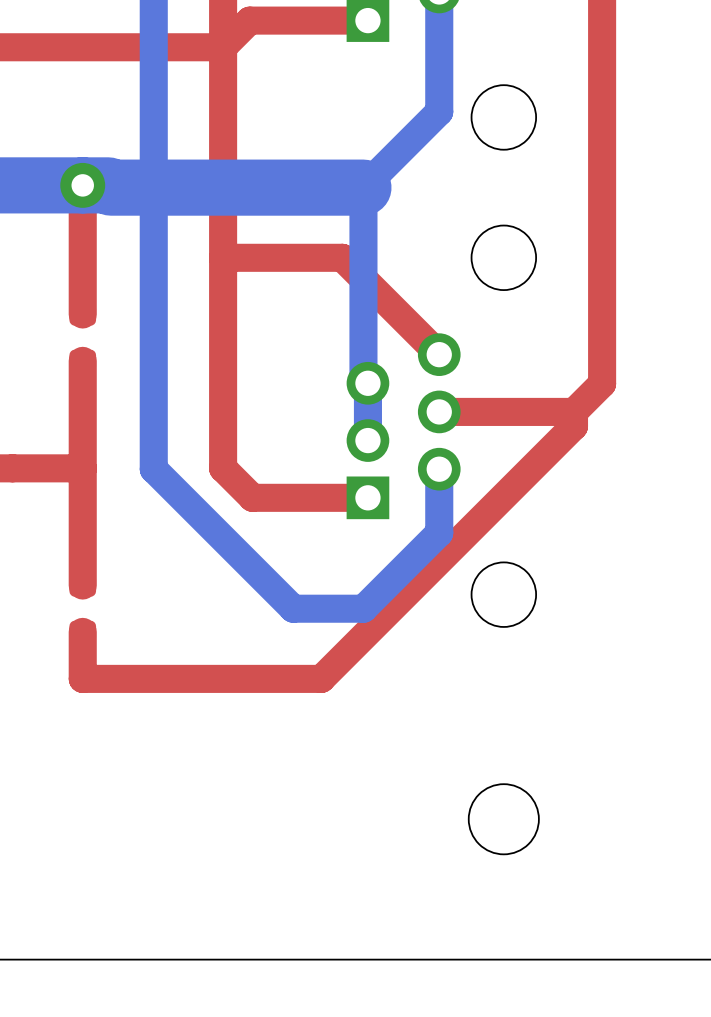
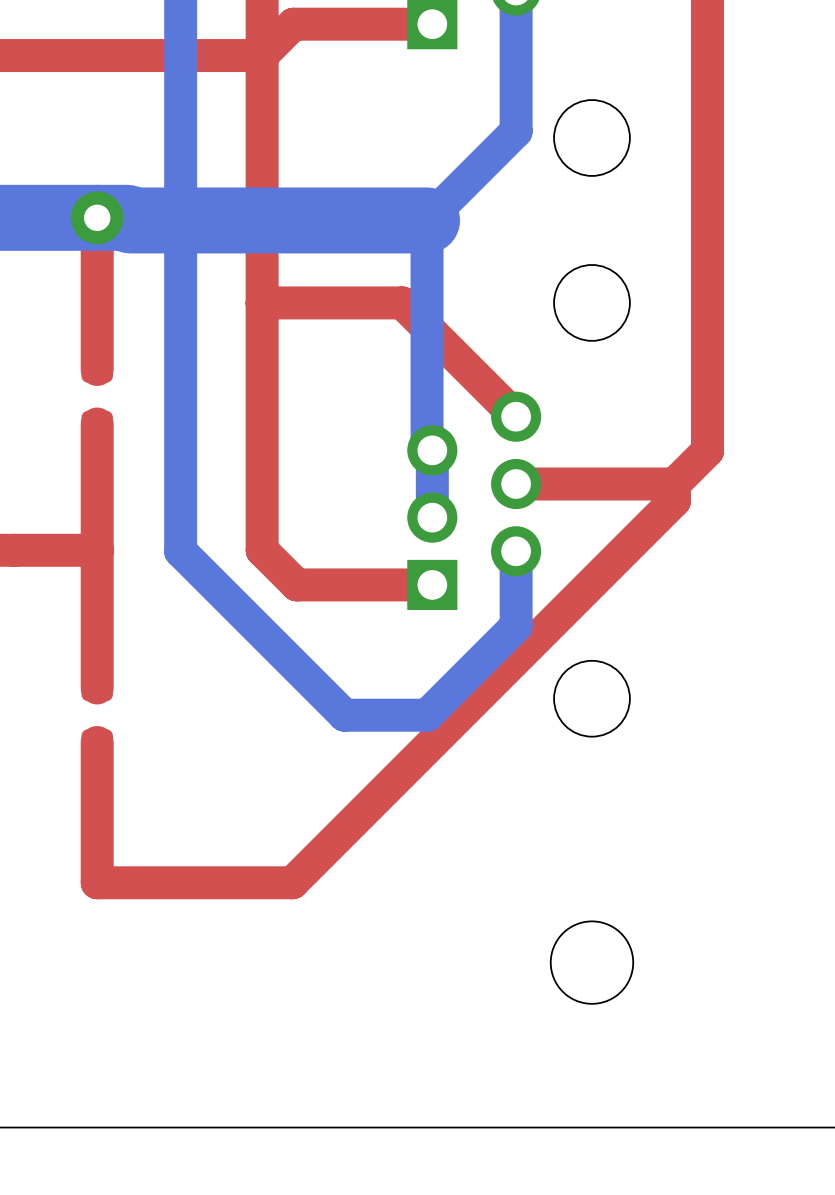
top track: (321, 678) (82, 678) -> (377, 797) (292, 882) (97, 882) (97, 797)

